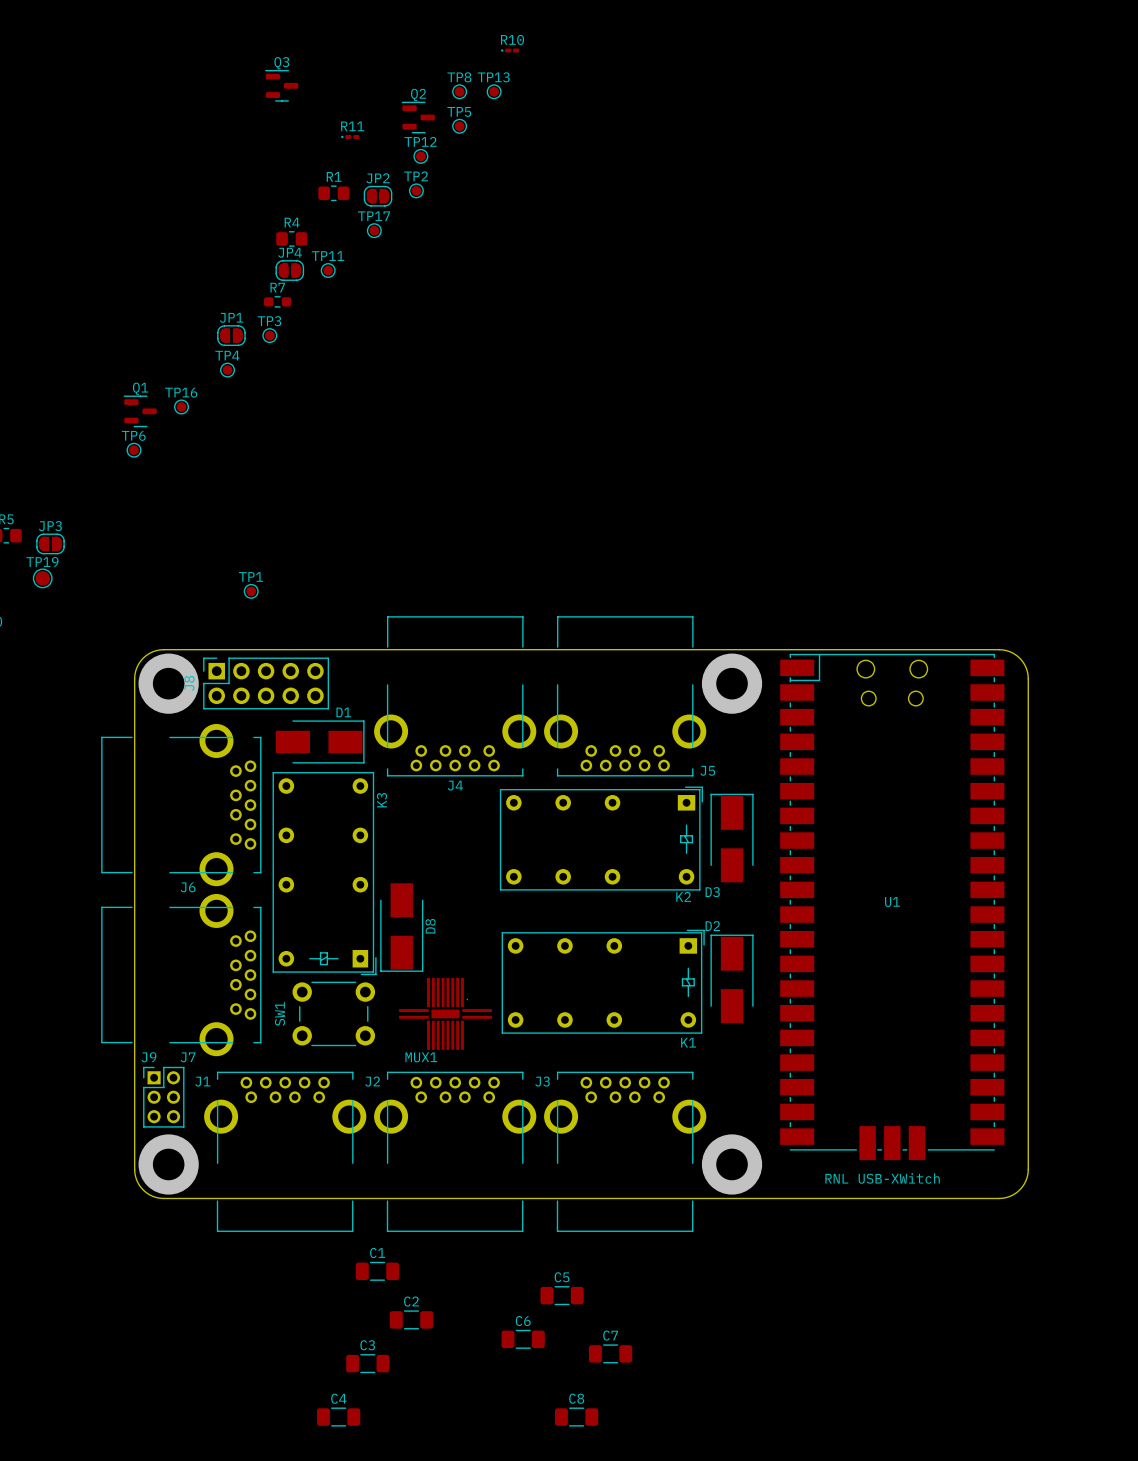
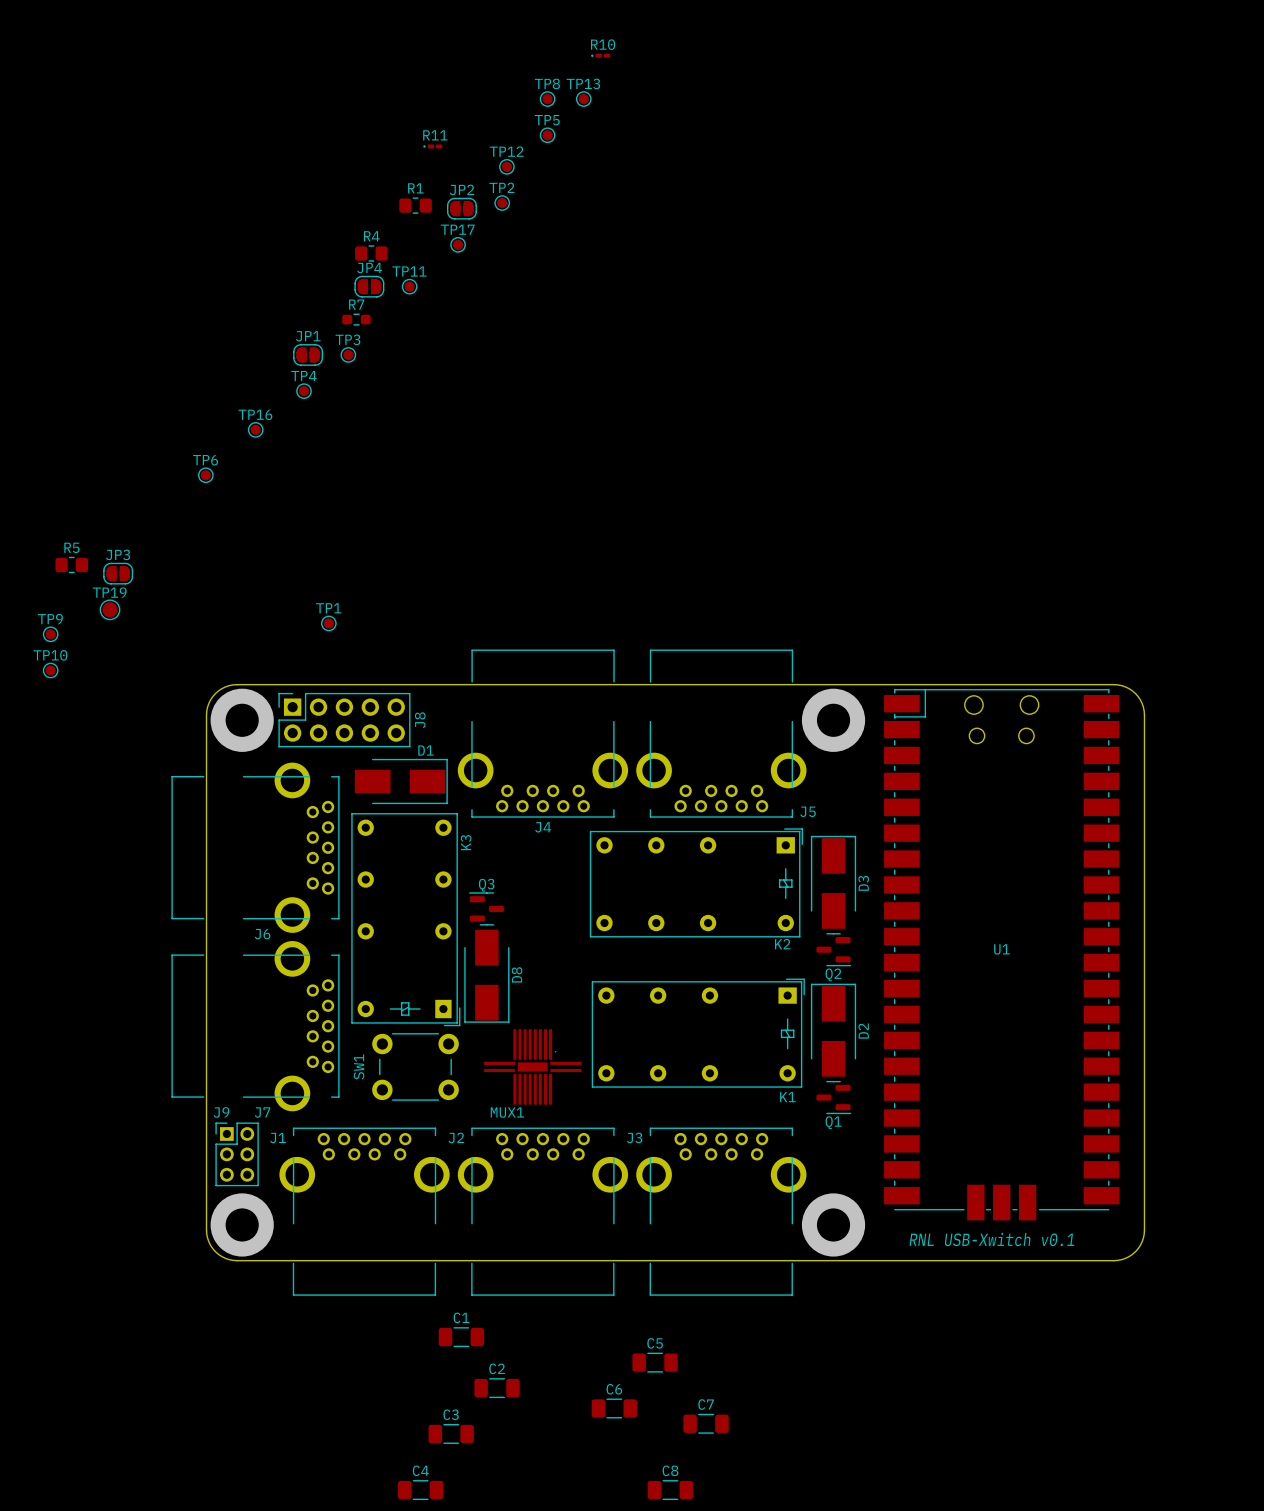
Q3 position: (281, 85) -> (486, 908)
Q2 rotation: 0° (418, 117) -> 180° (833, 949)
Q2 position: (418, 117) -> (833, 949)
Q1 rotation: 0° (140, 411) -> 180° (833, 1097)
Q1 position: (140, 411) -> (833, 1097)
J8 name position: J8 (189, 683) -> J8 (420, 720)
D3 name rotation: 0° (712, 892) -> 90° counterclockwise (863, 883)
D3 name position: D3 (712, 892) -> D3 (863, 883)
D2 name rotation: 0° (712, 926) -> 90° counterclockwise (863, 1031)
D2 name position: D2 (712, 926) -> D2 (863, 1031)
text: RNL USB-XWitch (882, 1178) -> RNL USB-Xwitch v0.1 (991, 1239)

